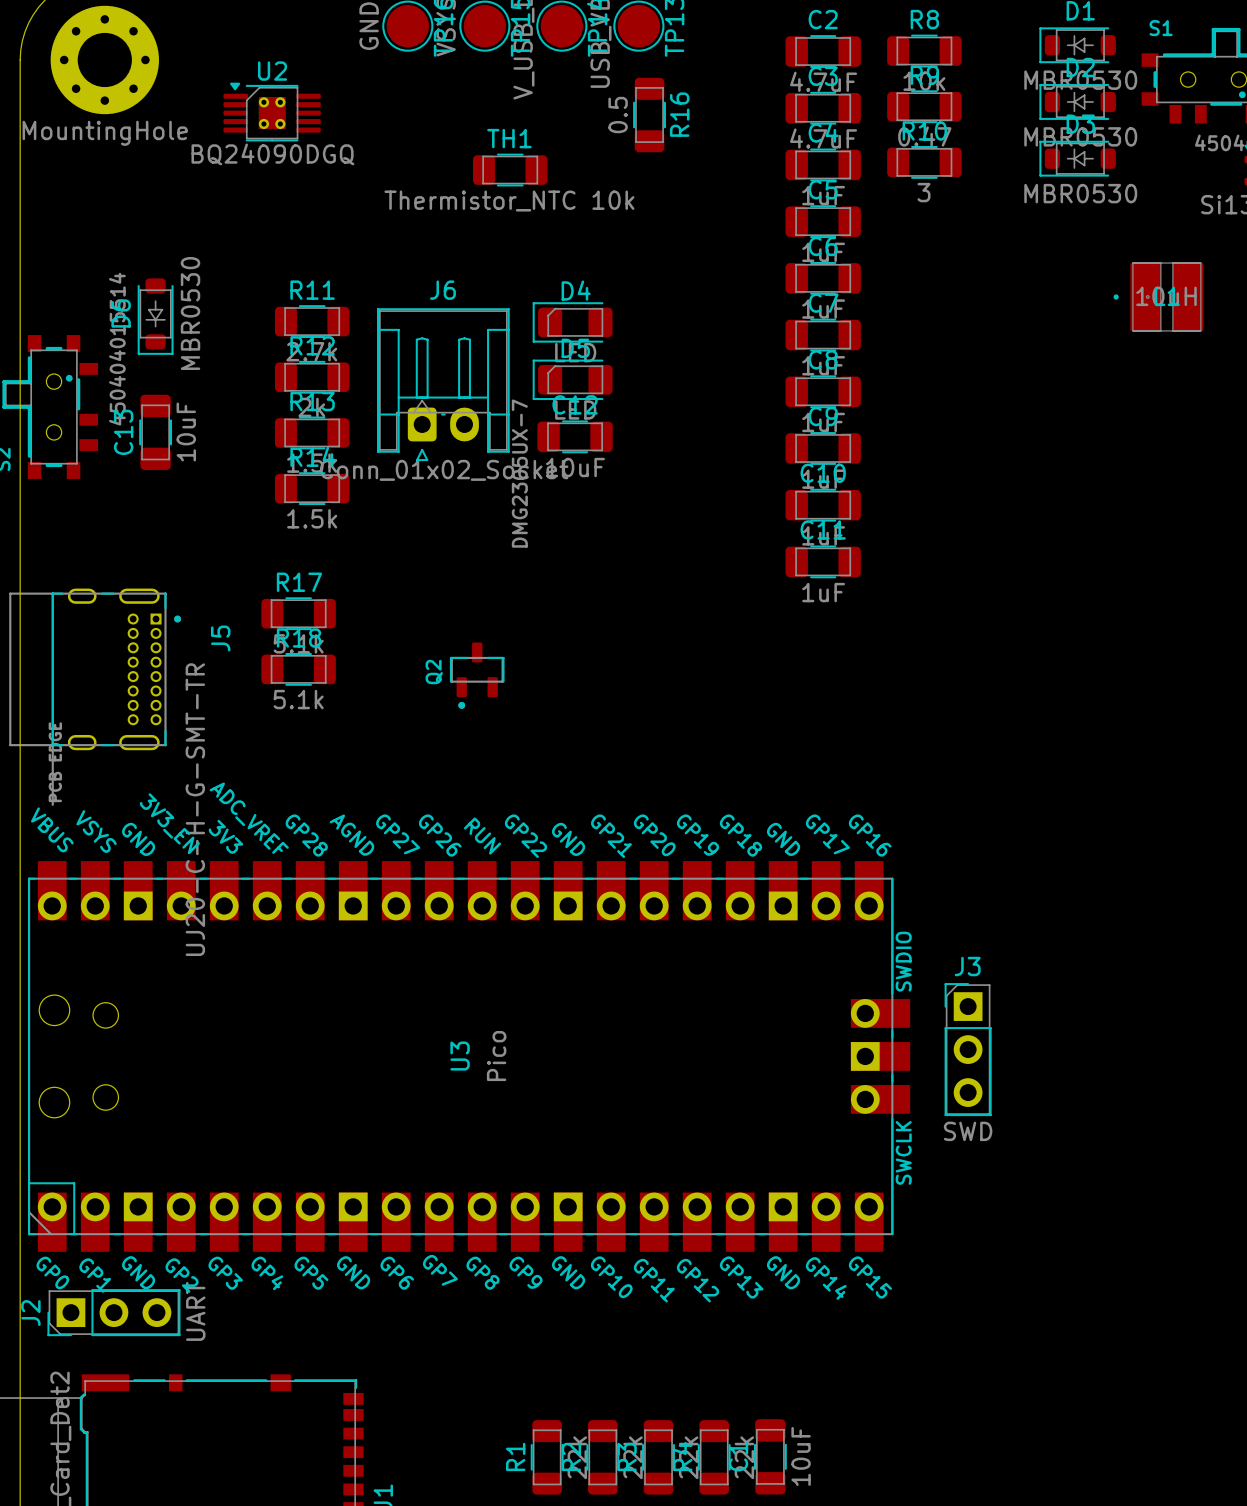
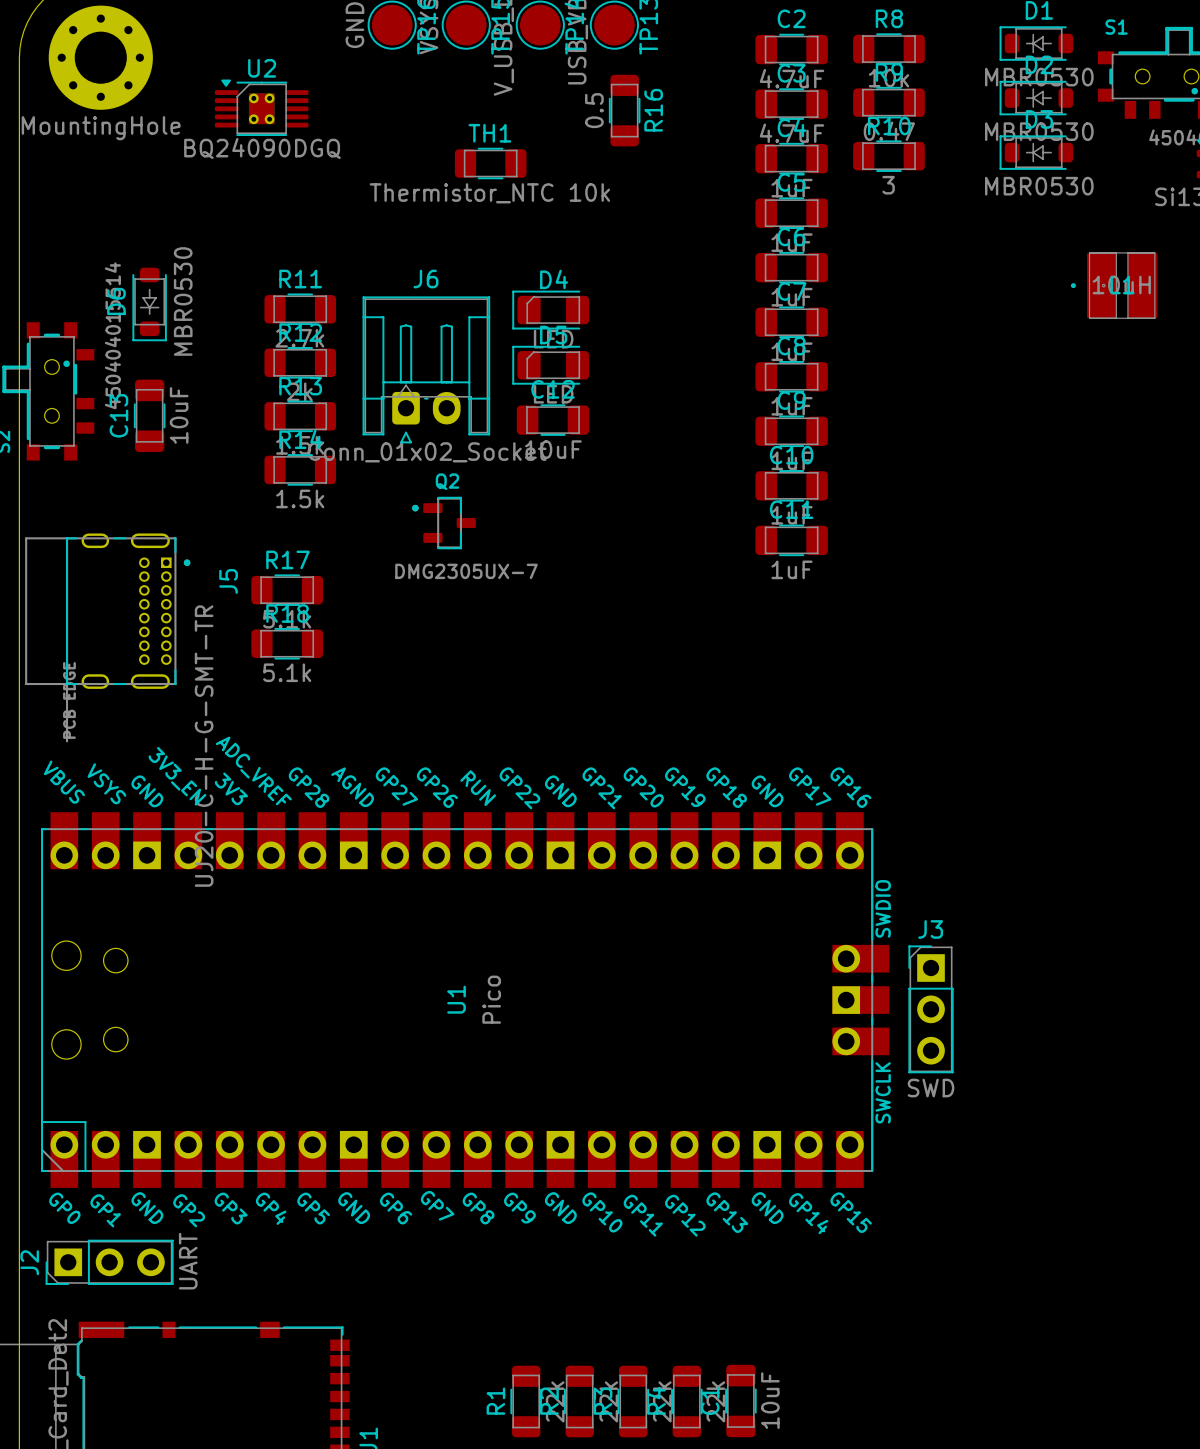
Q2 value position: DMG2305UX-7 (519, 473) -> DMG2305UX-7 (466, 571)
Q2 rotation: 0° (477, 675) -> 90° clockwise (443, 523)
Q2 position: (477, 675) -> (443, 523)
J5 position: (95, 697) -> (107, 637)
U1: none -> Pico (465, 1000)
U3: Pico (469, 1056) -> none

